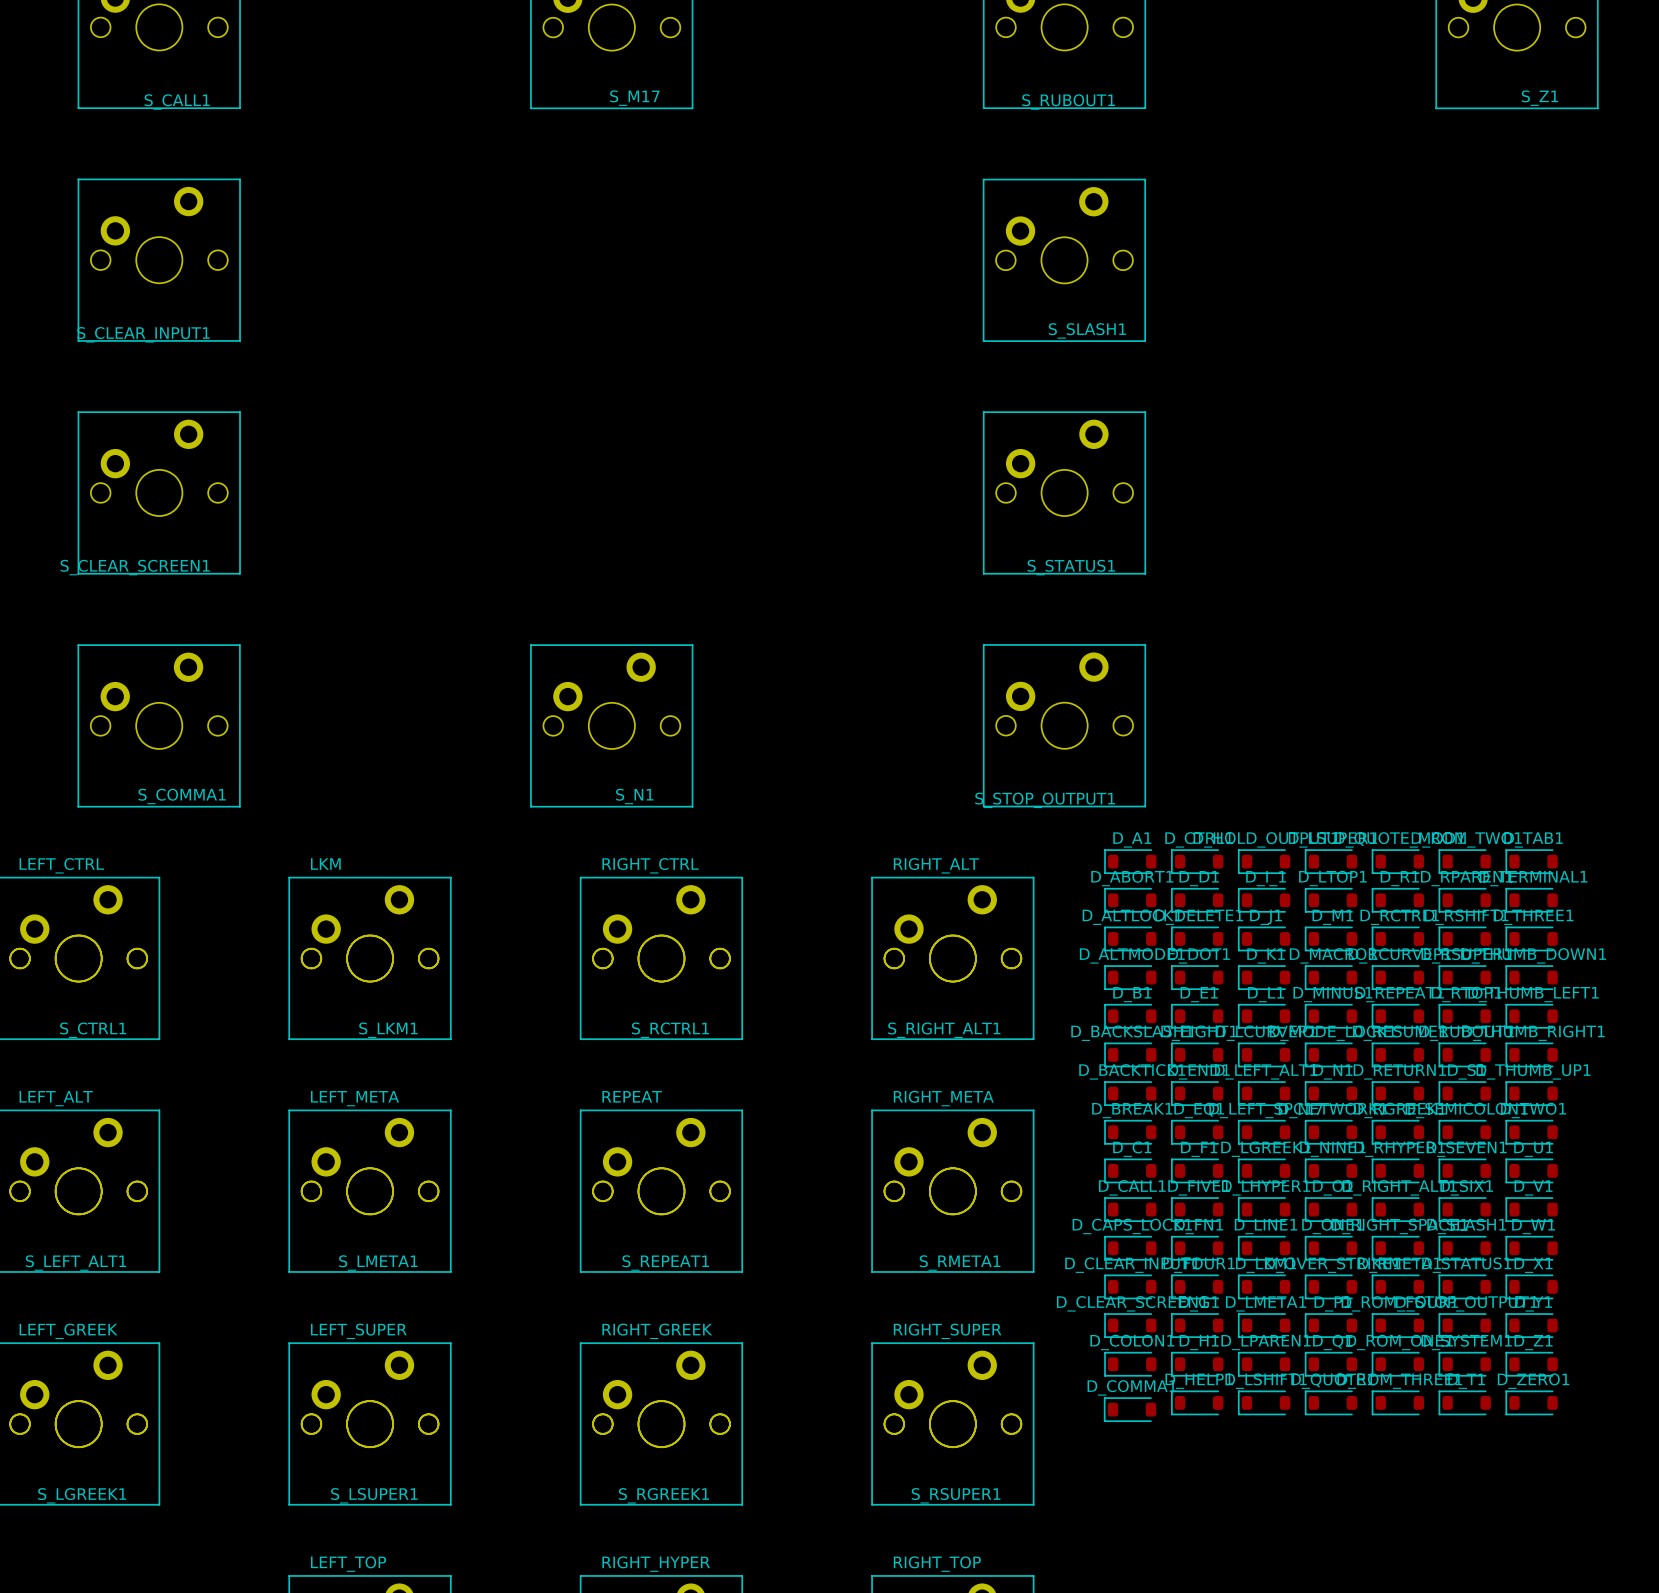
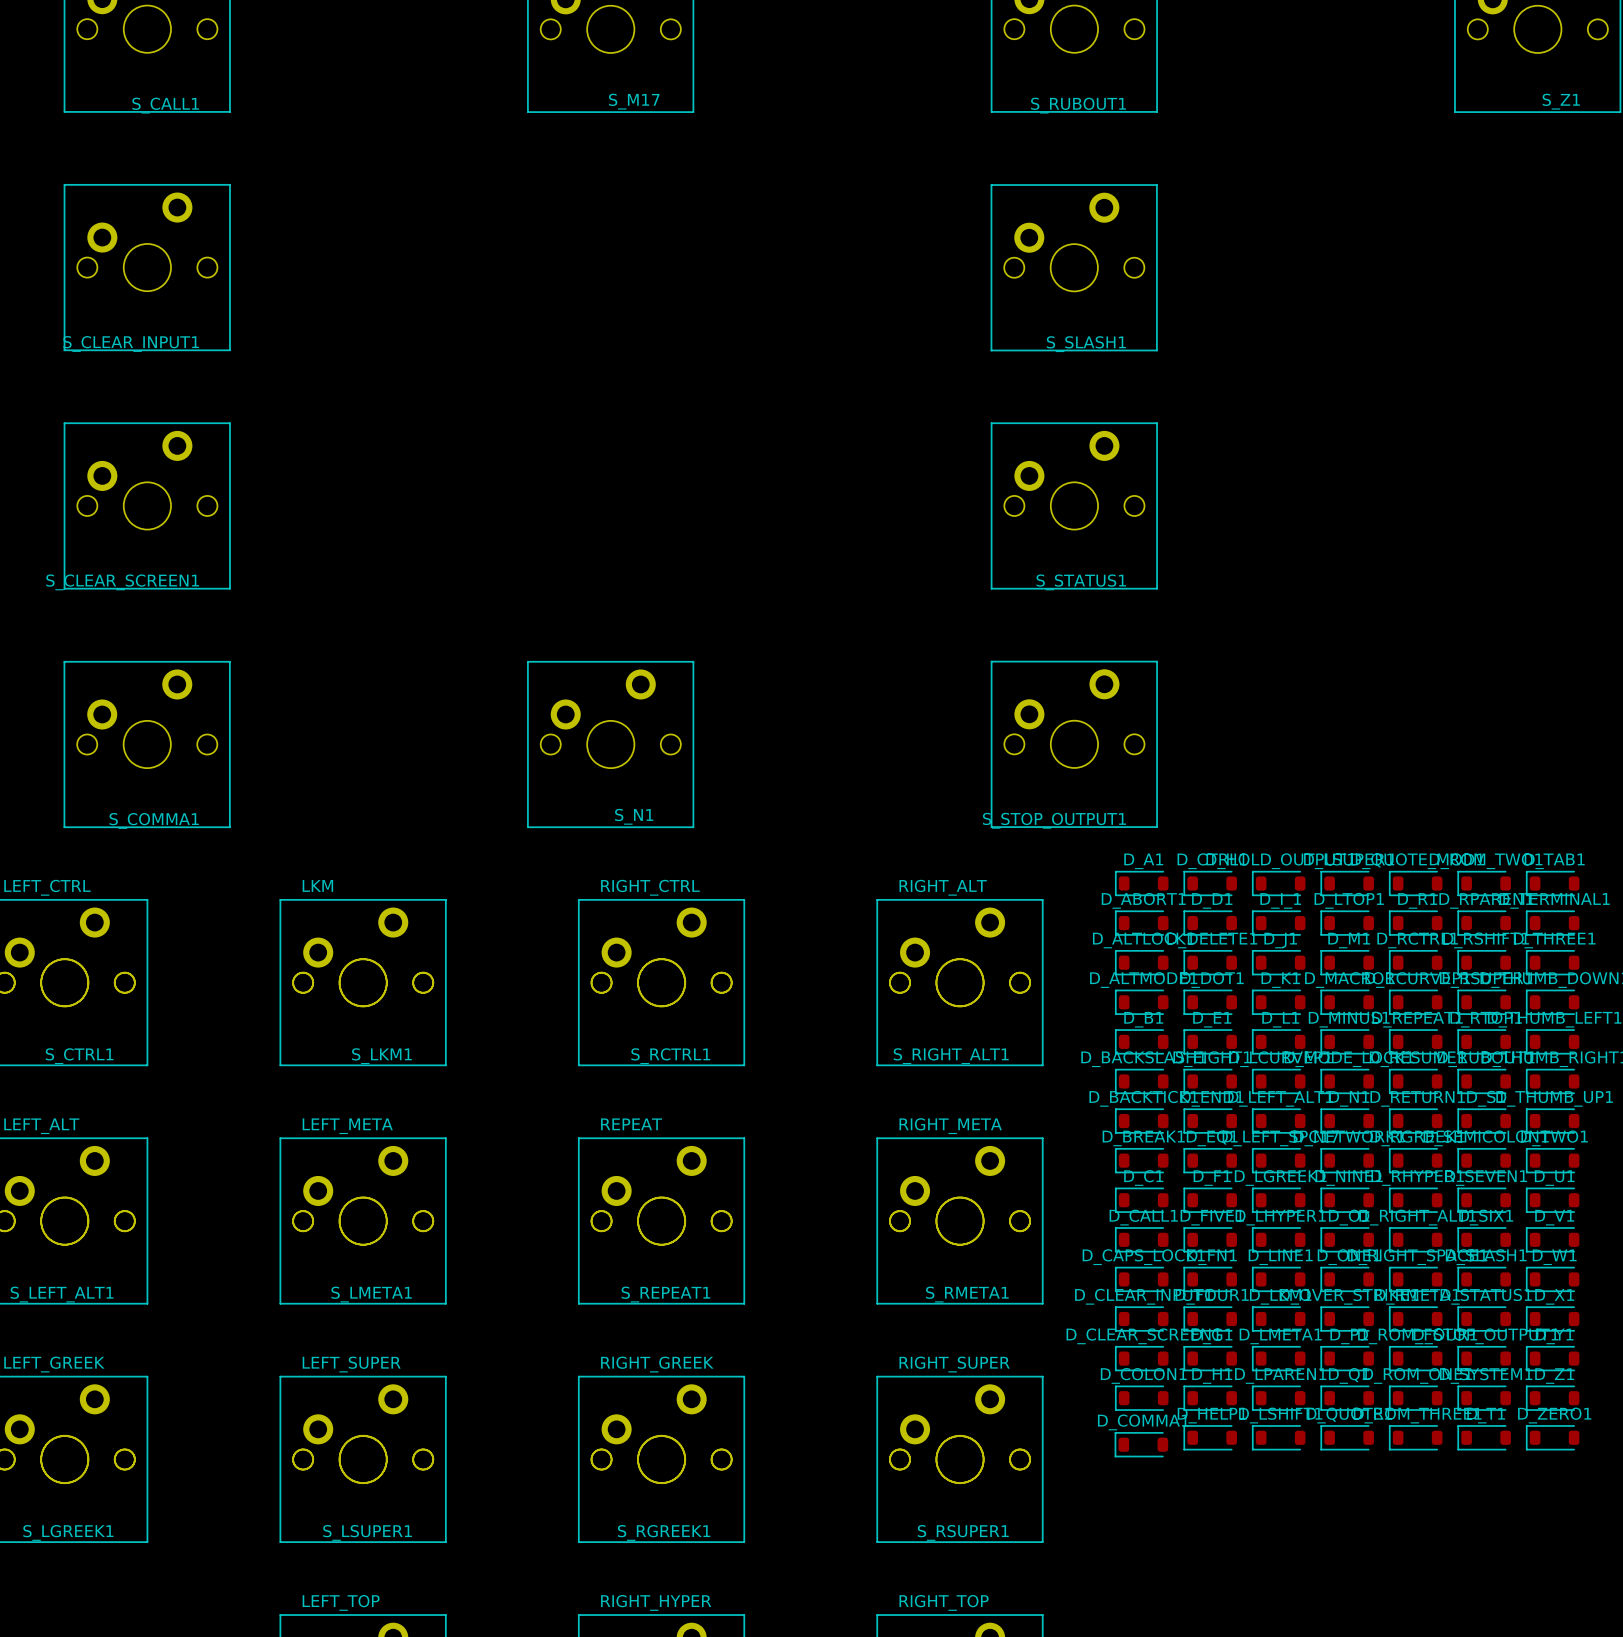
S_SLASH1 name position: S_SLASH1 (1087, 330) -> S_SLASH1 (1086, 344)
S_COMMA1 name position: S_COMMA1 (182, 796) -> S_COMMA1 (154, 820)

